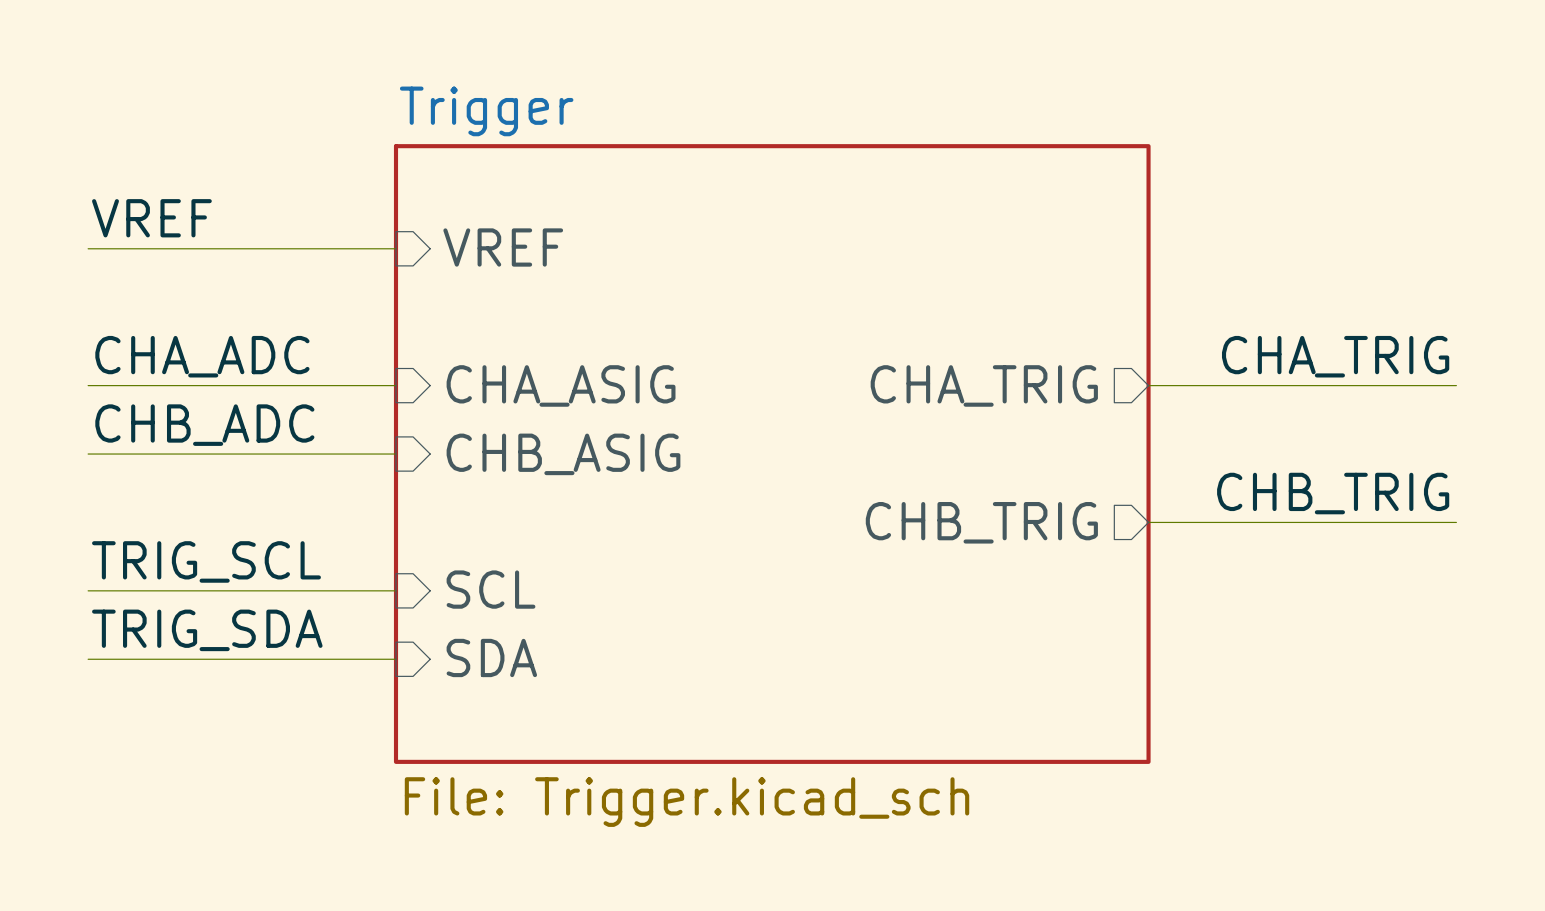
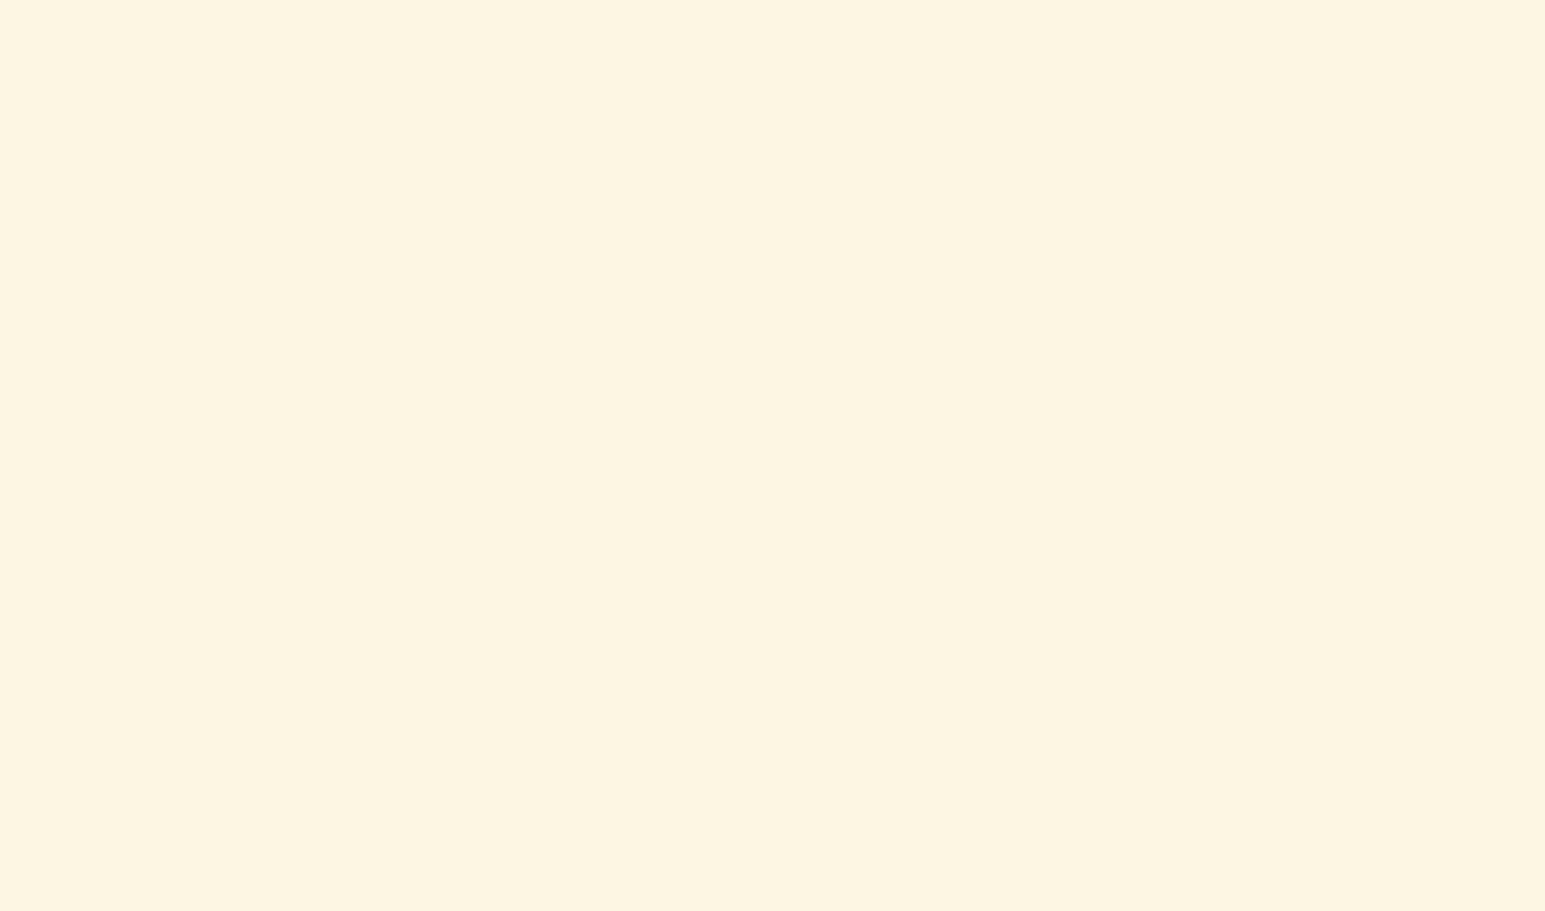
label: VREF (151, 218) -> none
sheet pin: VREF (503, 247) -> none
wire: (88, 248) (396, 248) -> none
label: CHA_ADC (202, 356) -> none
label: CHA_TRIG (1335, 356) -> none
wire: (88, 385) (396, 385) -> none
sheet pin: CHA_ASIG (561, 385) -> none
sheet pin: CHA_TRIG (984, 385) -> none
wire: (1148, 385) (1456, 385) -> none
label: CHB_ADC (204, 425) -> none
wire: (88, 454) (396, 454) -> none
sheet pin: CHB_ASIG (563, 454) -> none
sheet Trigger: File: Trigger.kicad_sch (772, 454) -> none
label: CHB_TRIG (1333, 493) -> none
sheet pin: CHB_TRIG (981, 522) -> none
wire: (1148, 522) (1456, 522) -> none
label: TRIG_SCL (206, 561) -> none
sheet pin: SCL (491, 589) -> none
wire: (88, 590) (396, 590) -> none
label: TRIG_SDA (207, 630) -> none
sheet pin: SDA (491, 657) -> none
wire: (88, 659) (396, 659) -> none

